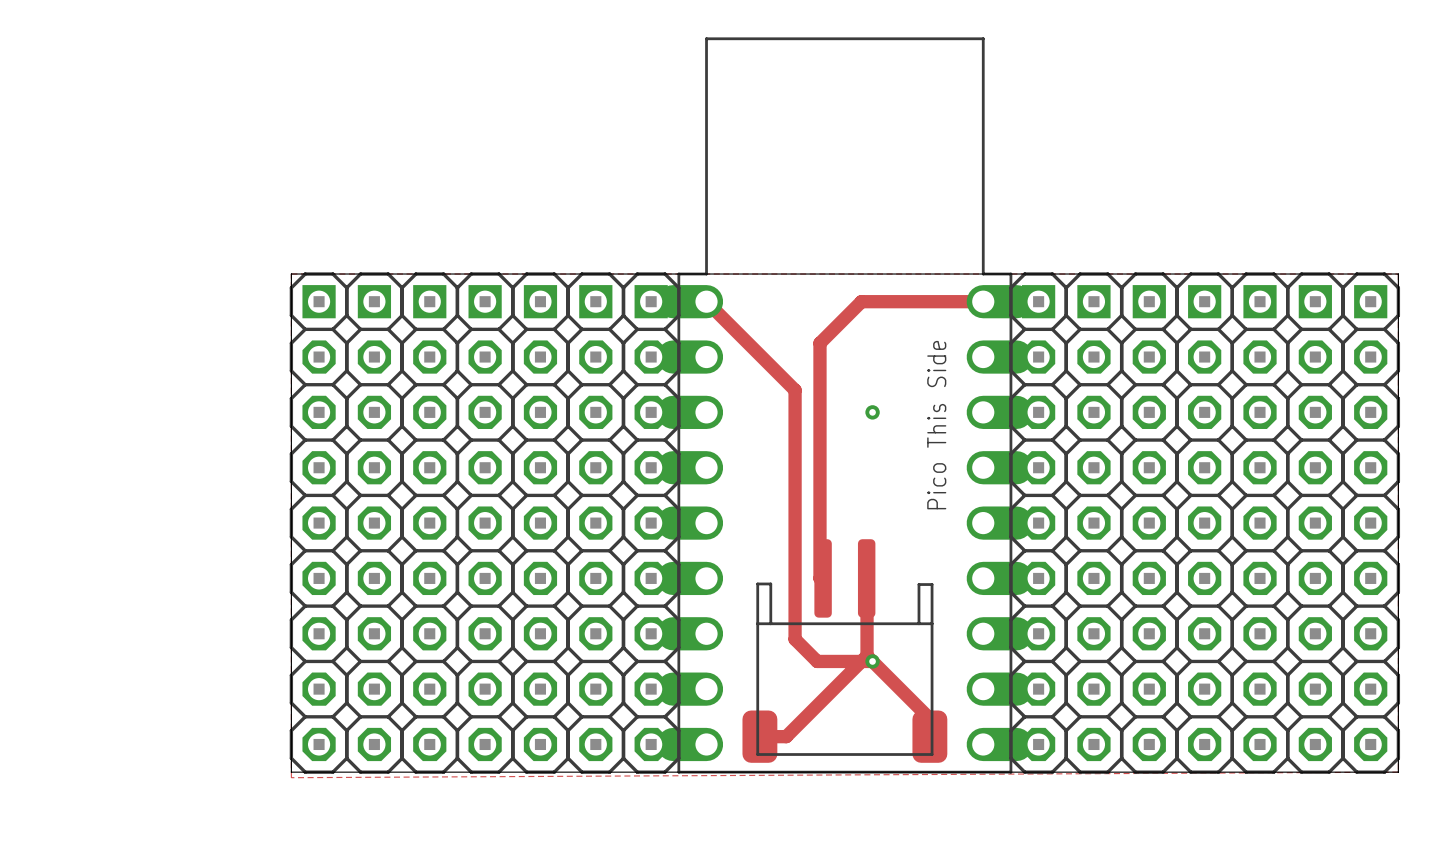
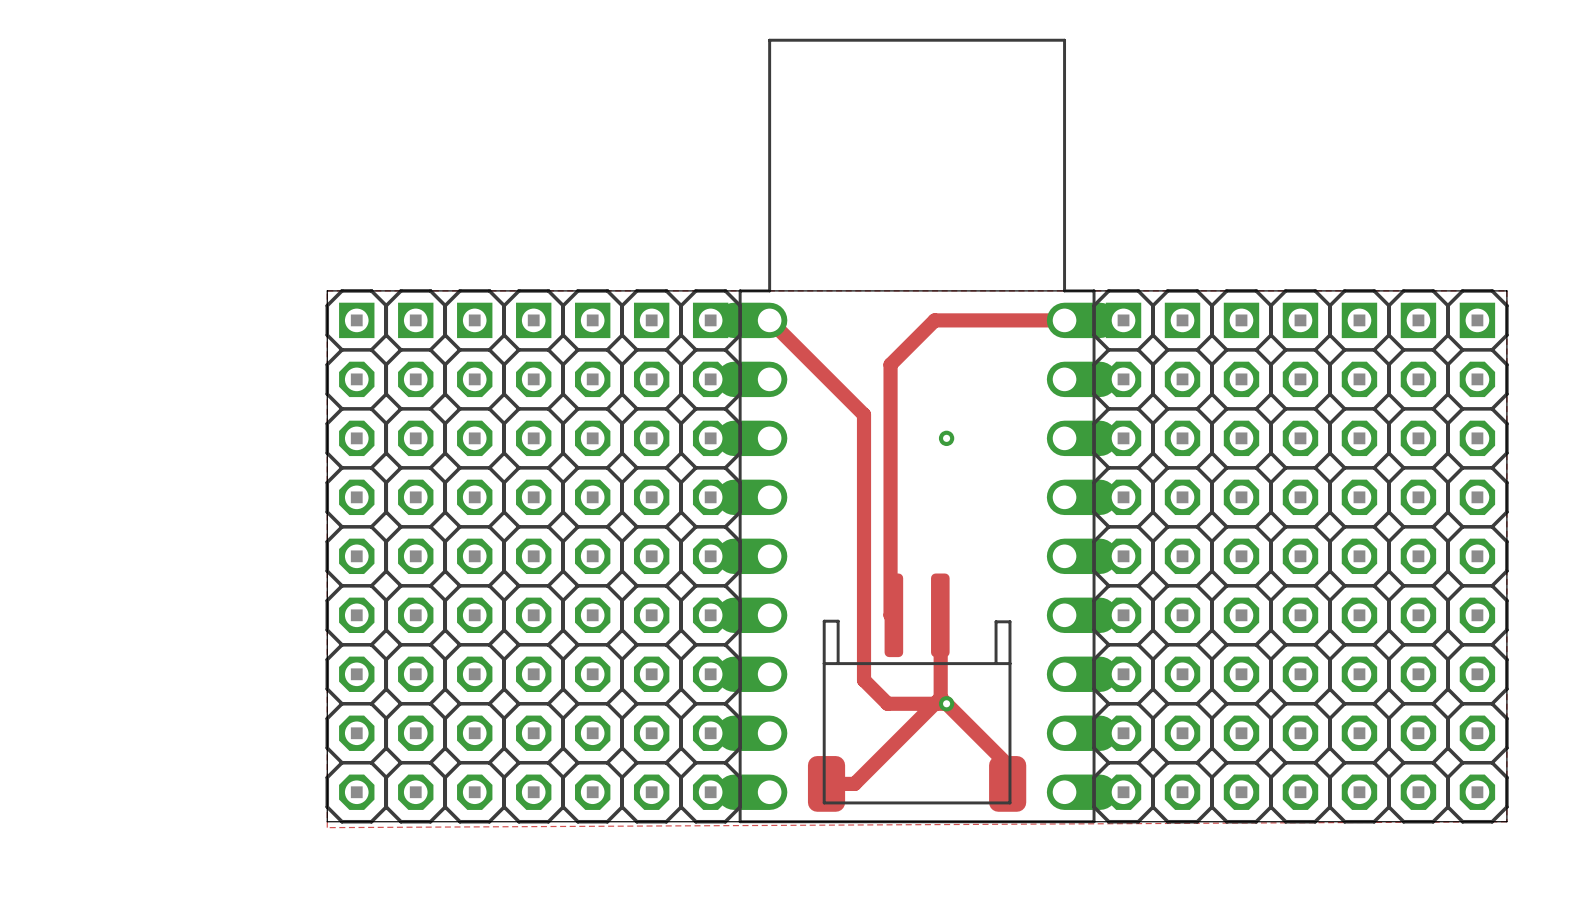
text: Pico This Side (936, 425) -> none

